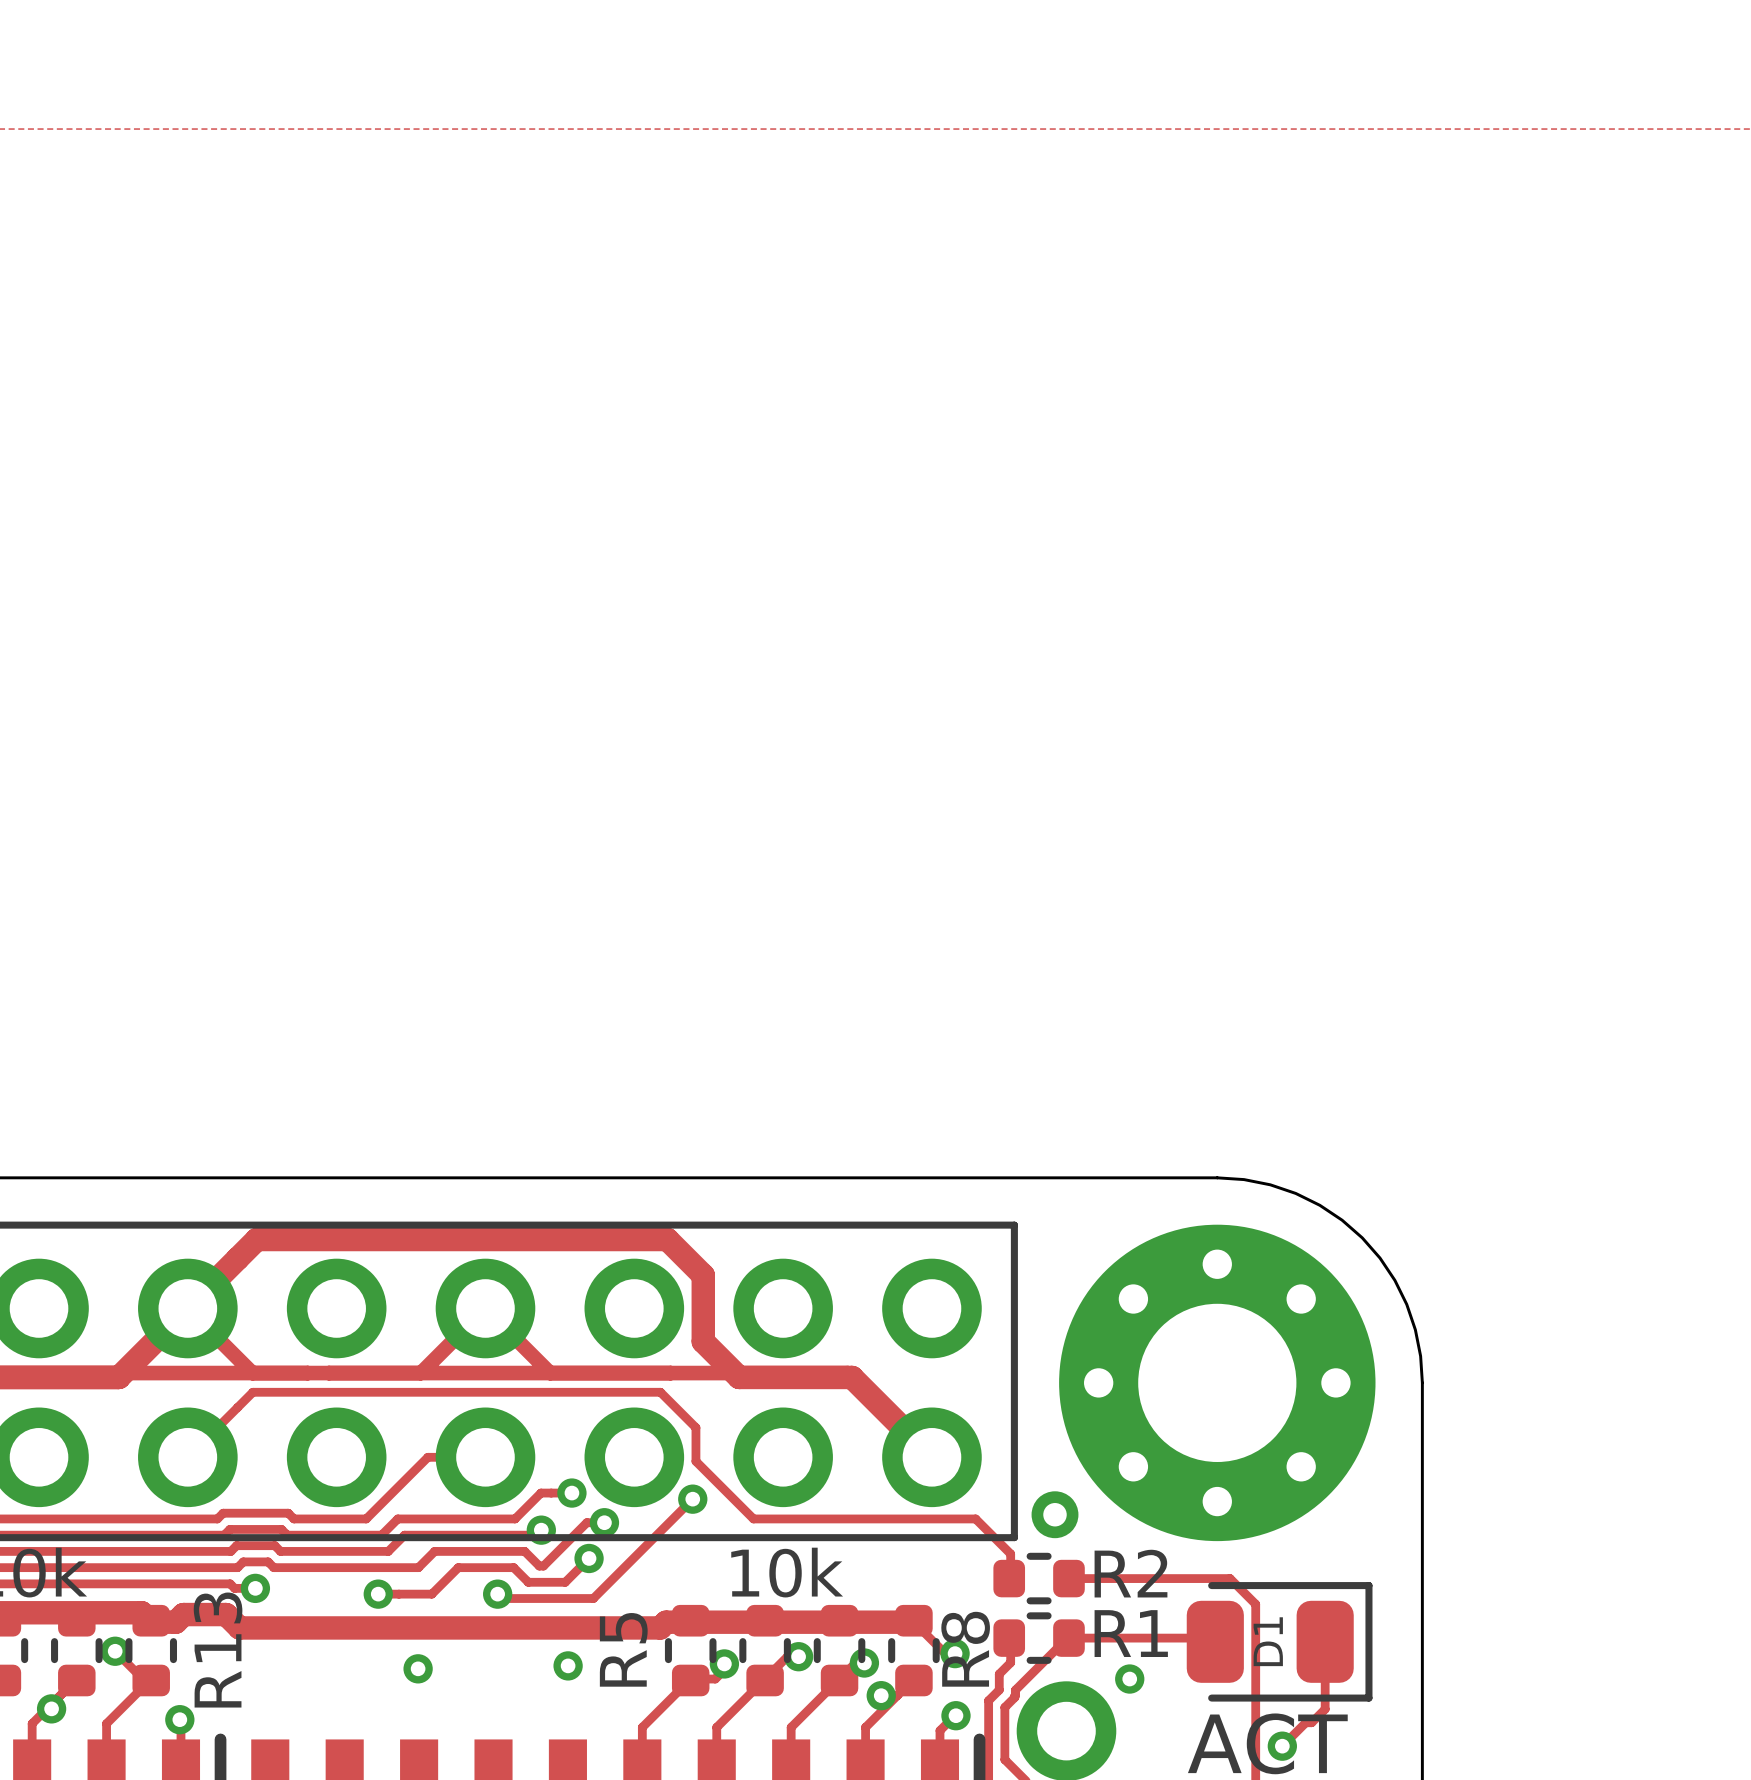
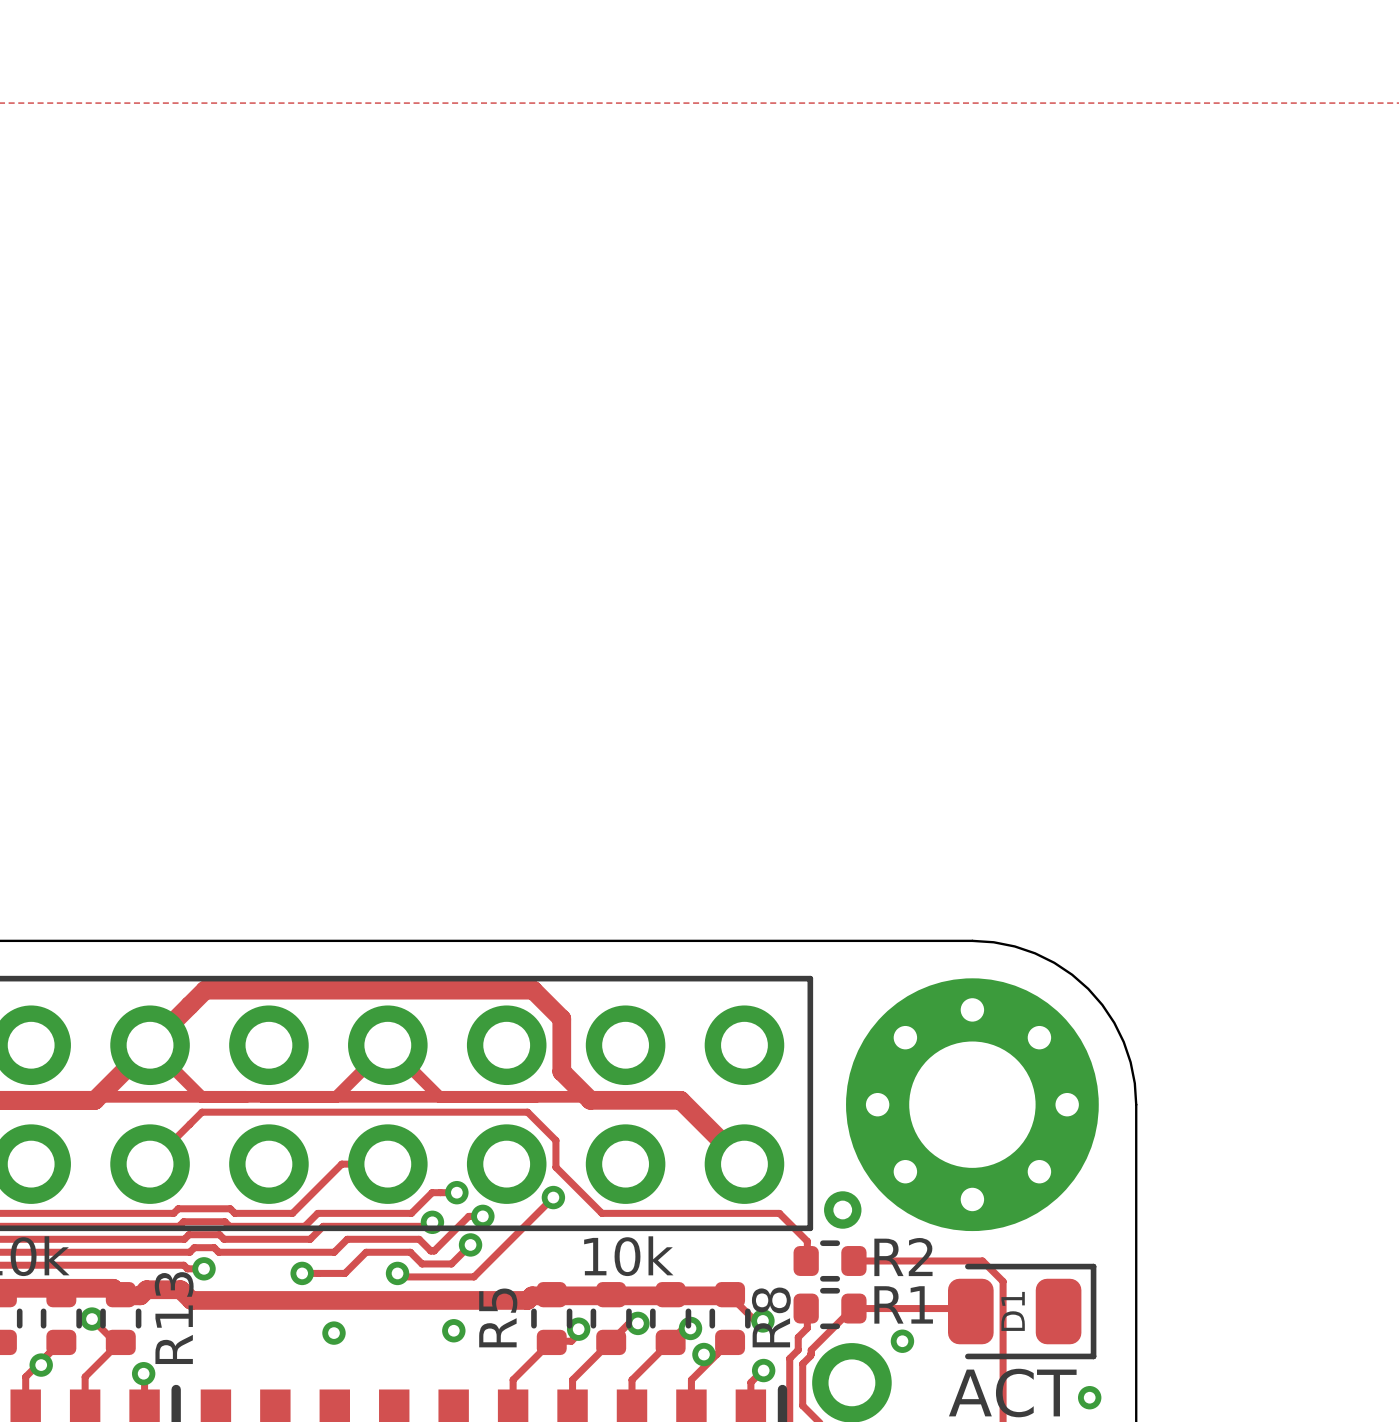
track: (1325, 1641) (1325, 1709) (1311, 1722) (1305, 1722) (1282, 1746) -> none
via position: (1282, 1746) -> (1089, 1397)

